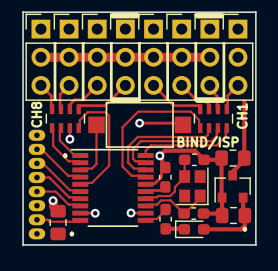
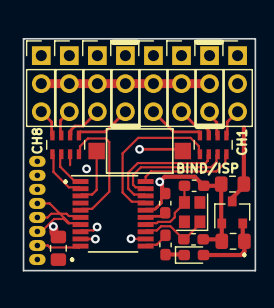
via position: (69, 139) -> (86, 168)
track: (36, 149) (41, 149) (68, 175) (80, 177) -> none
track: (36, 163) (43, 163) (69, 190) -> none
track: (47, 191) (55, 191) (68, 204) (80, 205) -> (47, 217) (51, 213) (66, 213) (70, 216)
track: none -> (69, 223) (63, 218) (54, 218) (41, 231) (37, 231)
track: none -> (97, 227) (93, 230) (80, 231)
via: none -> (97, 227)

